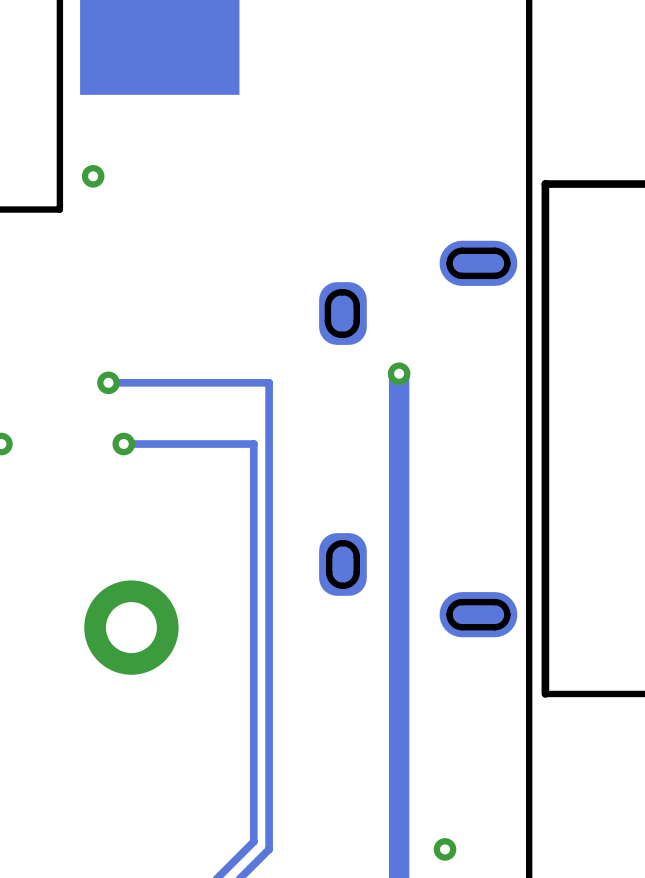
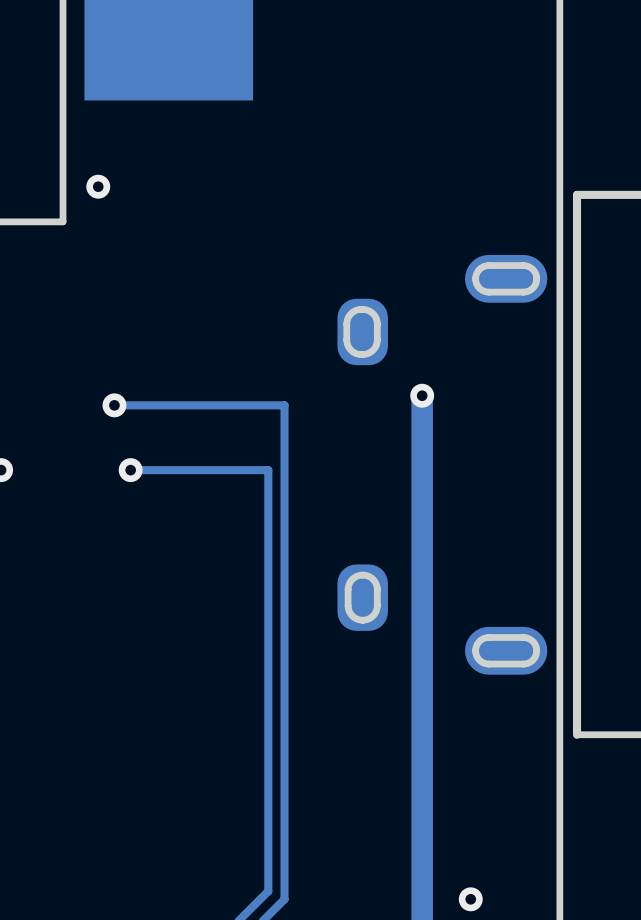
part: (131, 627) -> none

